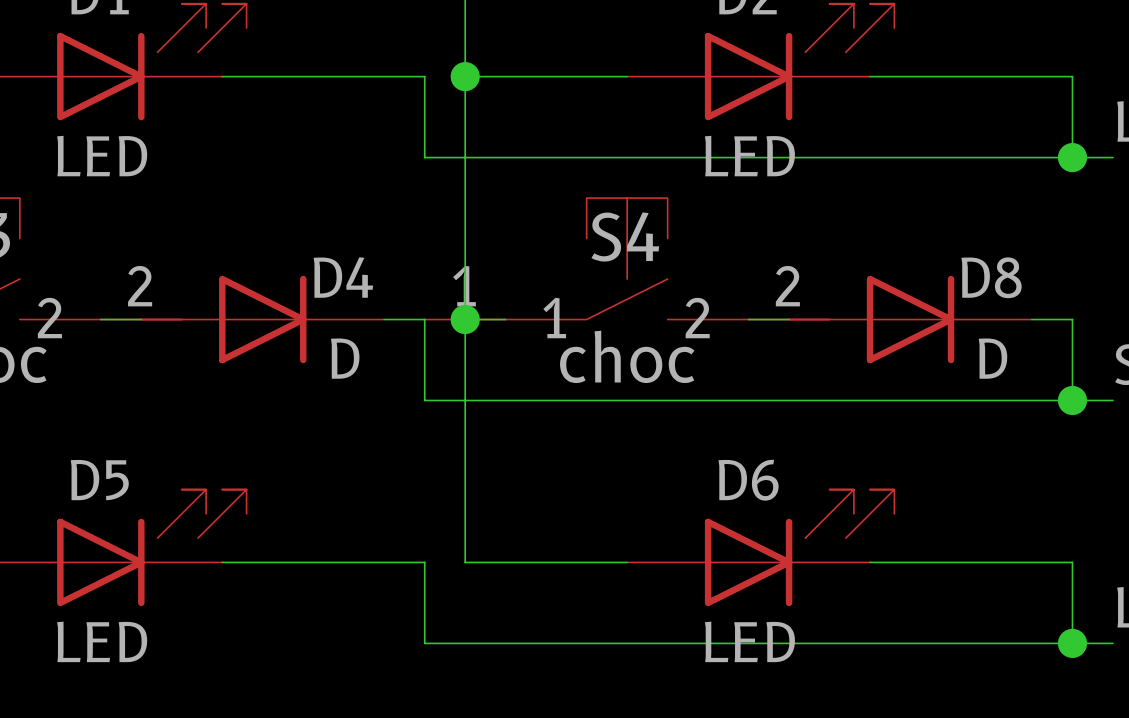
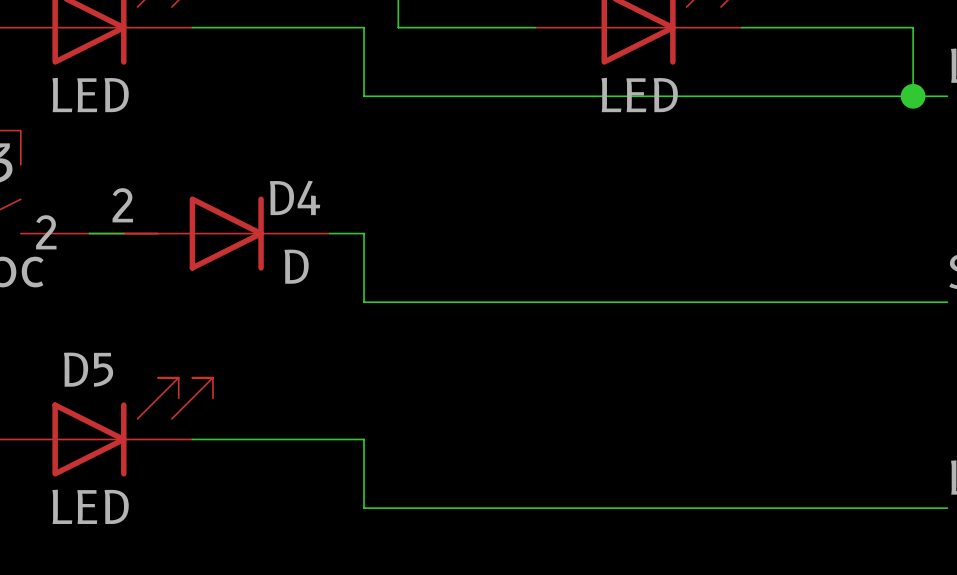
wire: (465, 76) (465, 562) (627, 562) -> none
junction: (465, 76) -> none
S4: choc (627, 258) -> none
wire: (465, 319) (505, 319) -> none
junction: (465, 319) -> none
wire: (748, 319) (789, 319) -> none
D8: D (910, 319) -> none
wire: (1032, 319) (1072, 319) (1072, 400) -> none
junction: (1072, 400) -> none
D6: LED (760, 547) -> none
wire: (870, 562) (1072, 562) (1072, 643) -> none
junction: (1072, 643) -> none

